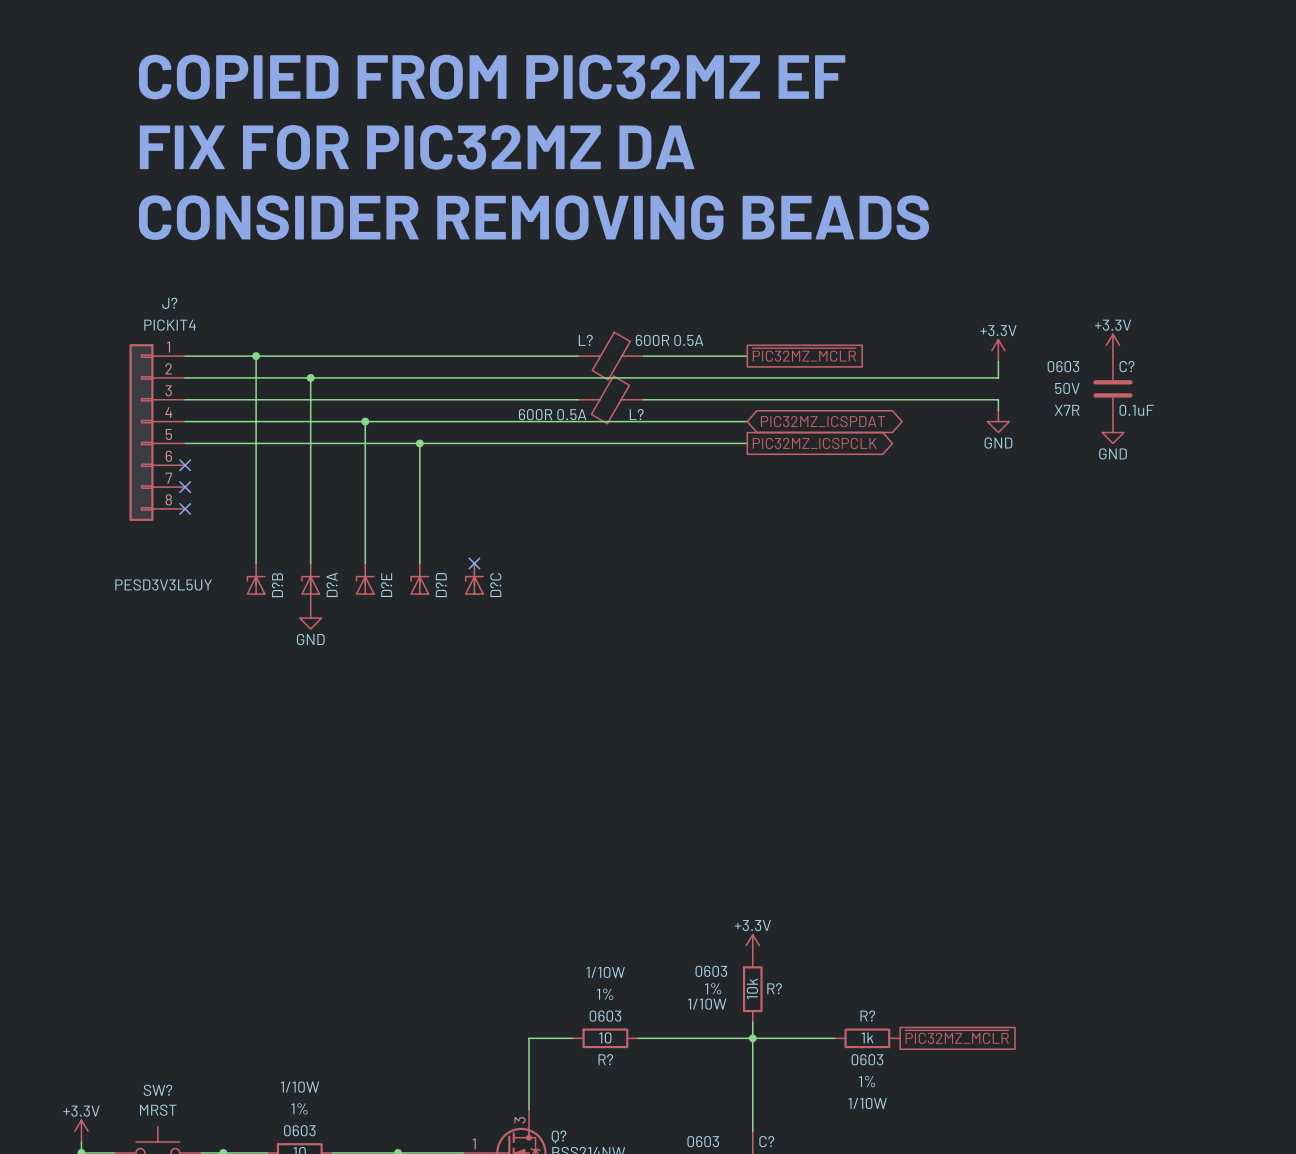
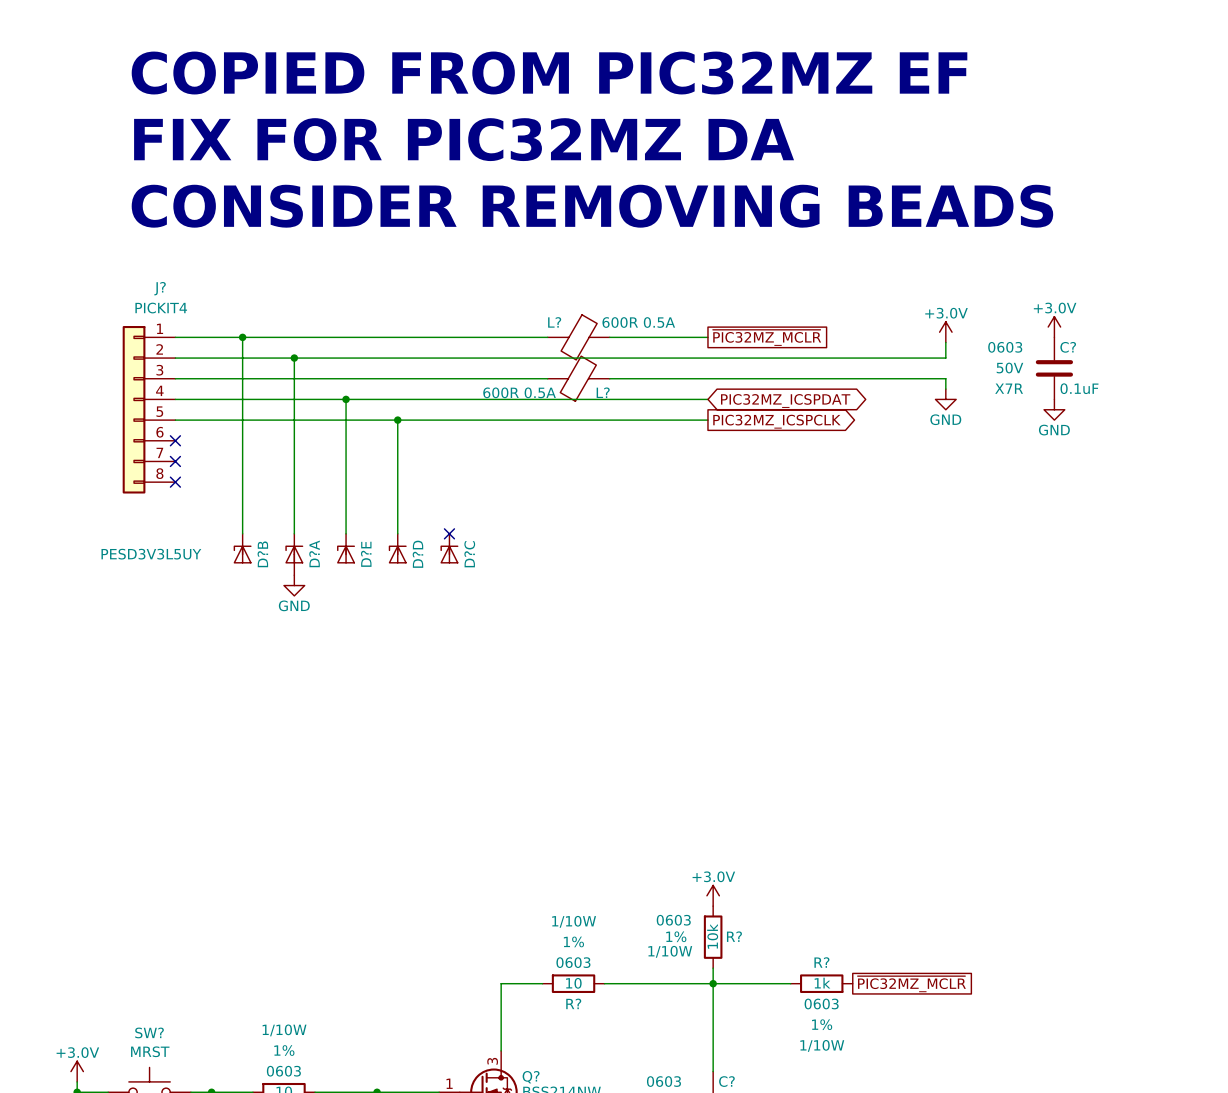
power symbol: +3.3V (1112, 345) -> +3.0V (1054, 327)
power symbol: +3.3V (998, 350) -> +3.0V (945, 332)
power symbol: +3.3V (752, 945) -> +3.0V (713, 895)
power symbol: +3.3V (81, 1131) -> +3.0V (77, 1071)

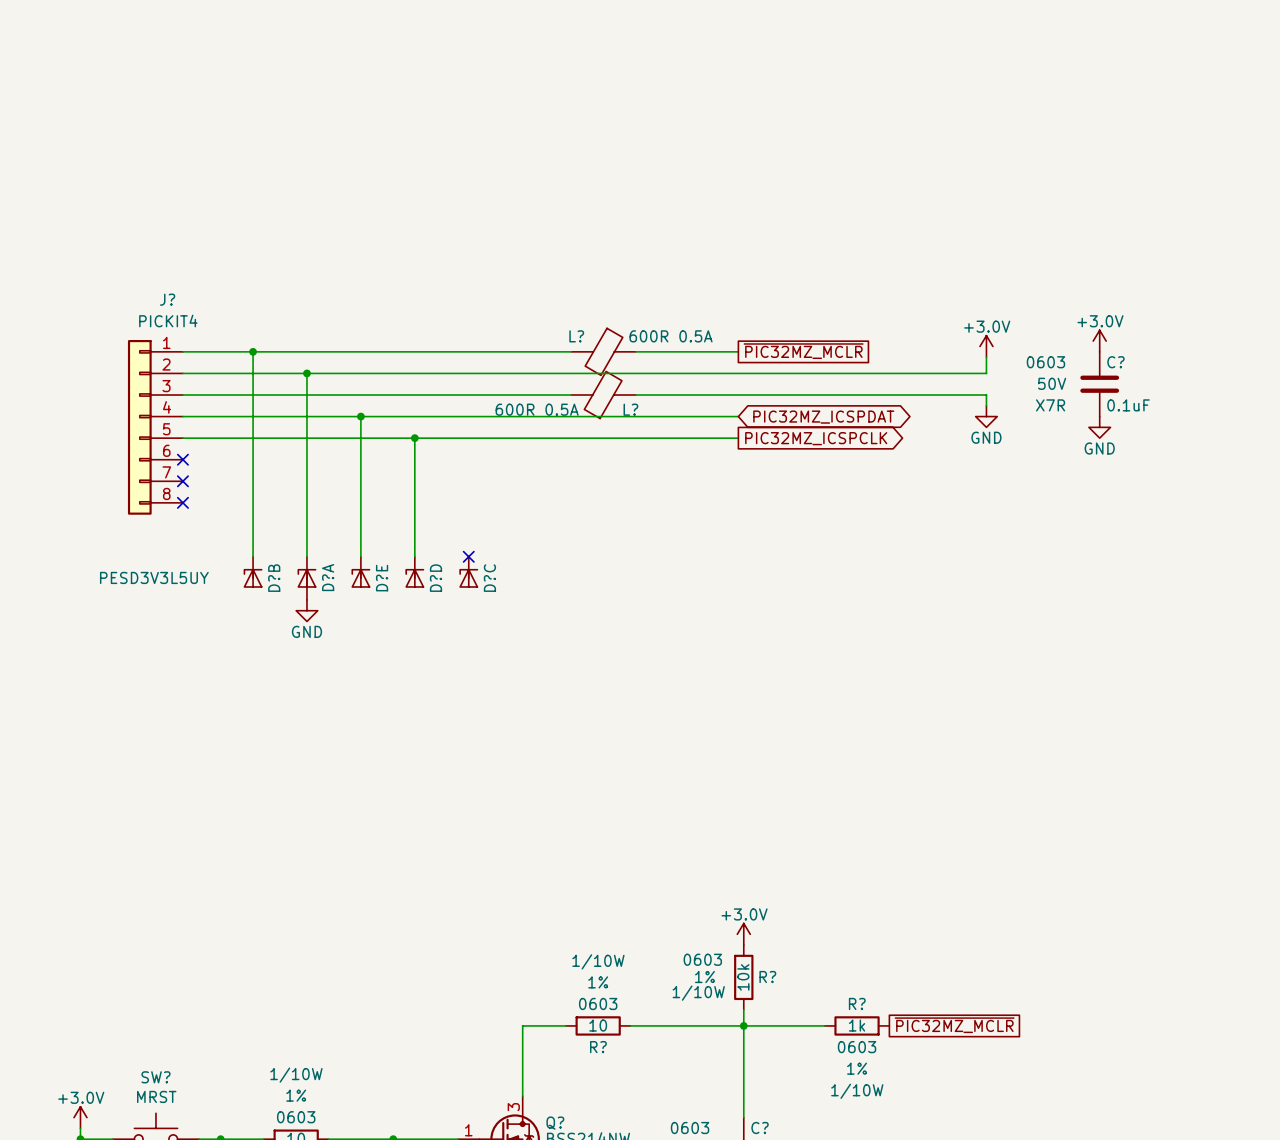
text: COPIED FROM PIC32MZ EF (549, 73) -> none
text: FIX FOR PIC32MZ DA (464, 139) -> none
text: CONSIDER REMOVING BEADS (592, 206) -> none

